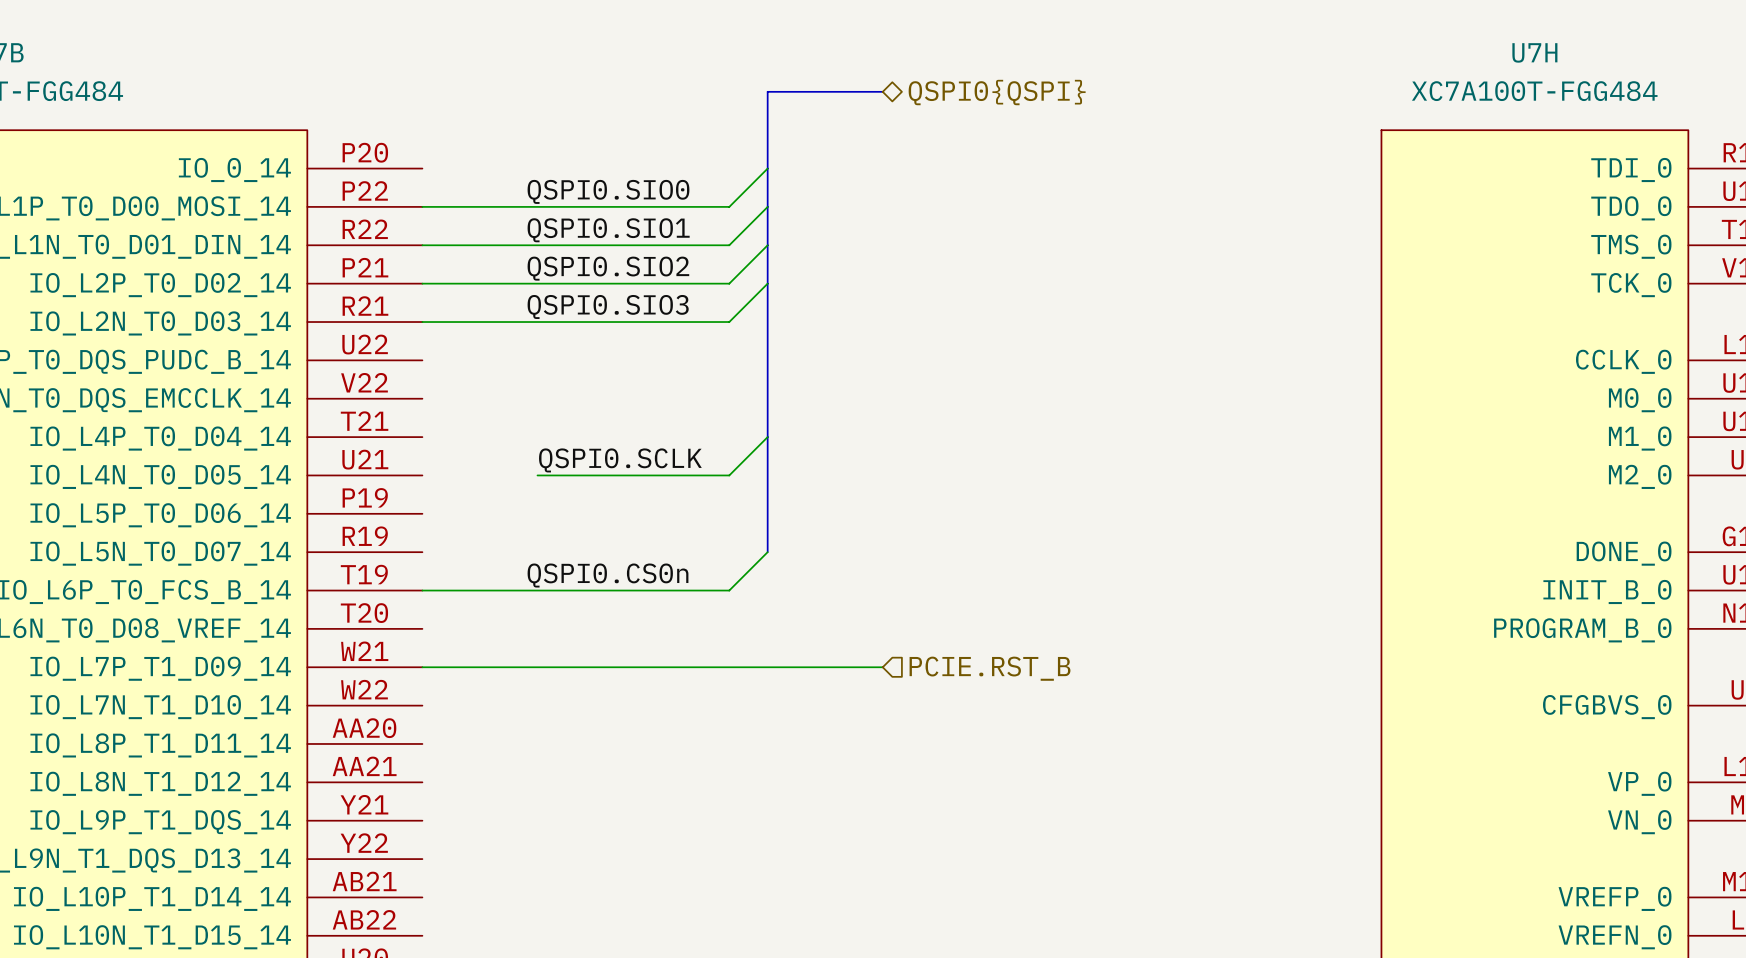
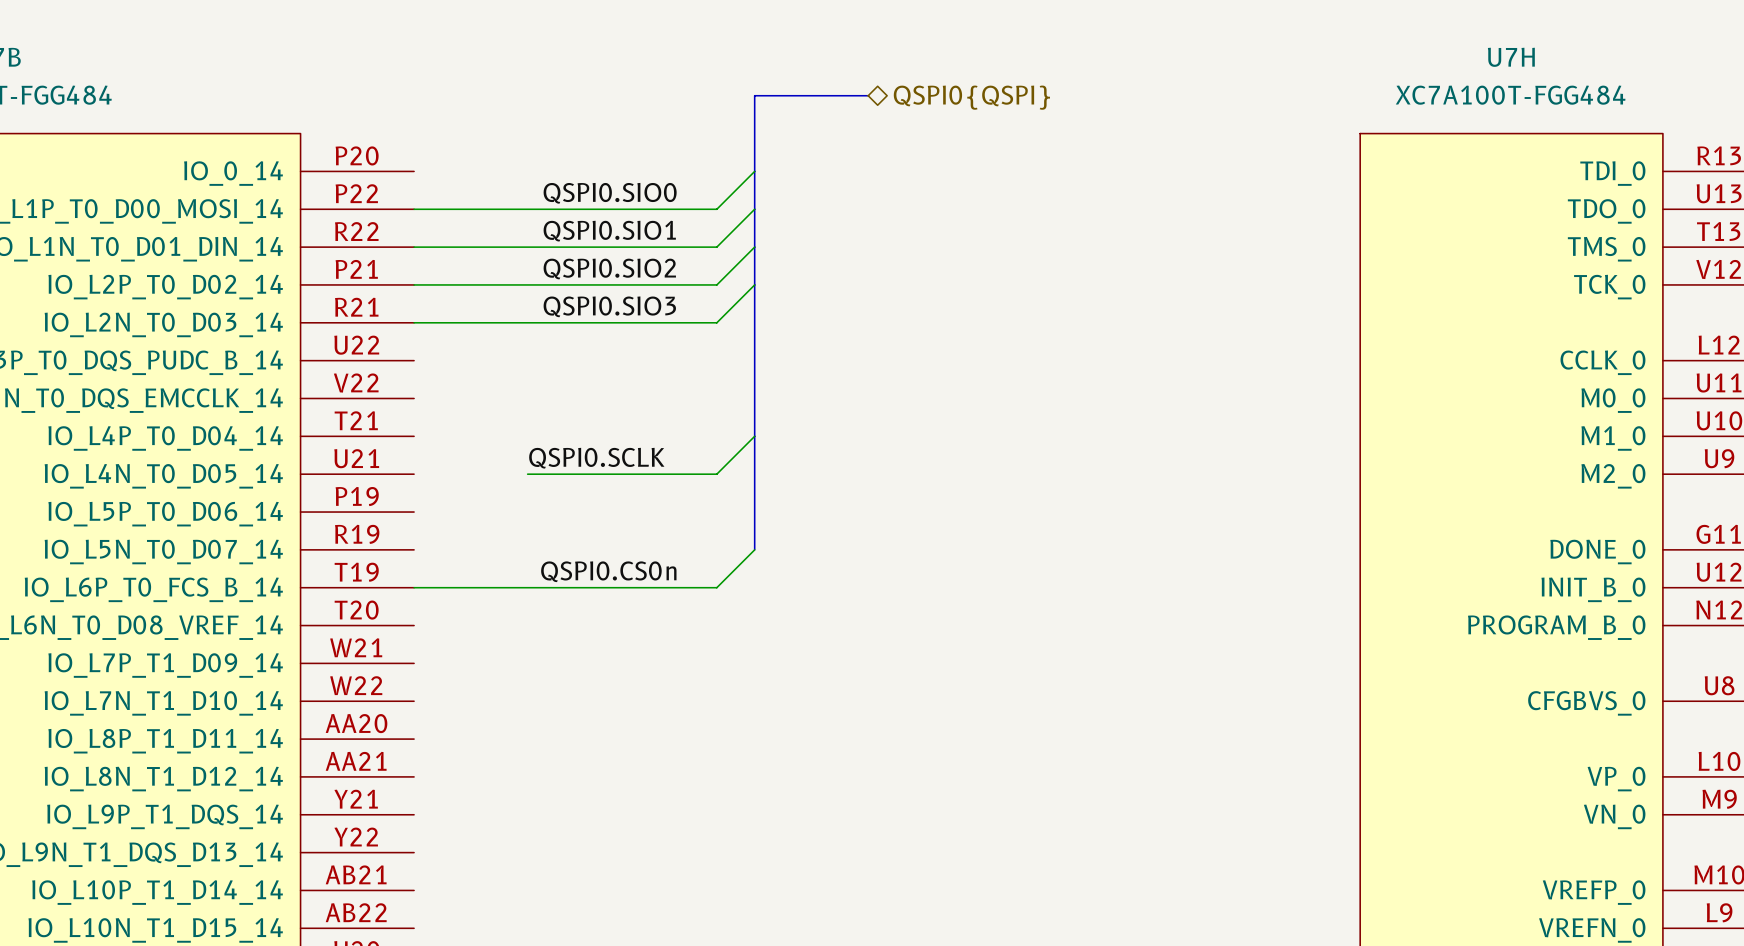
wire: (422, 667) (882, 667) -> none
hierarchical label: PCIE.RST_B (990, 668) -> none

